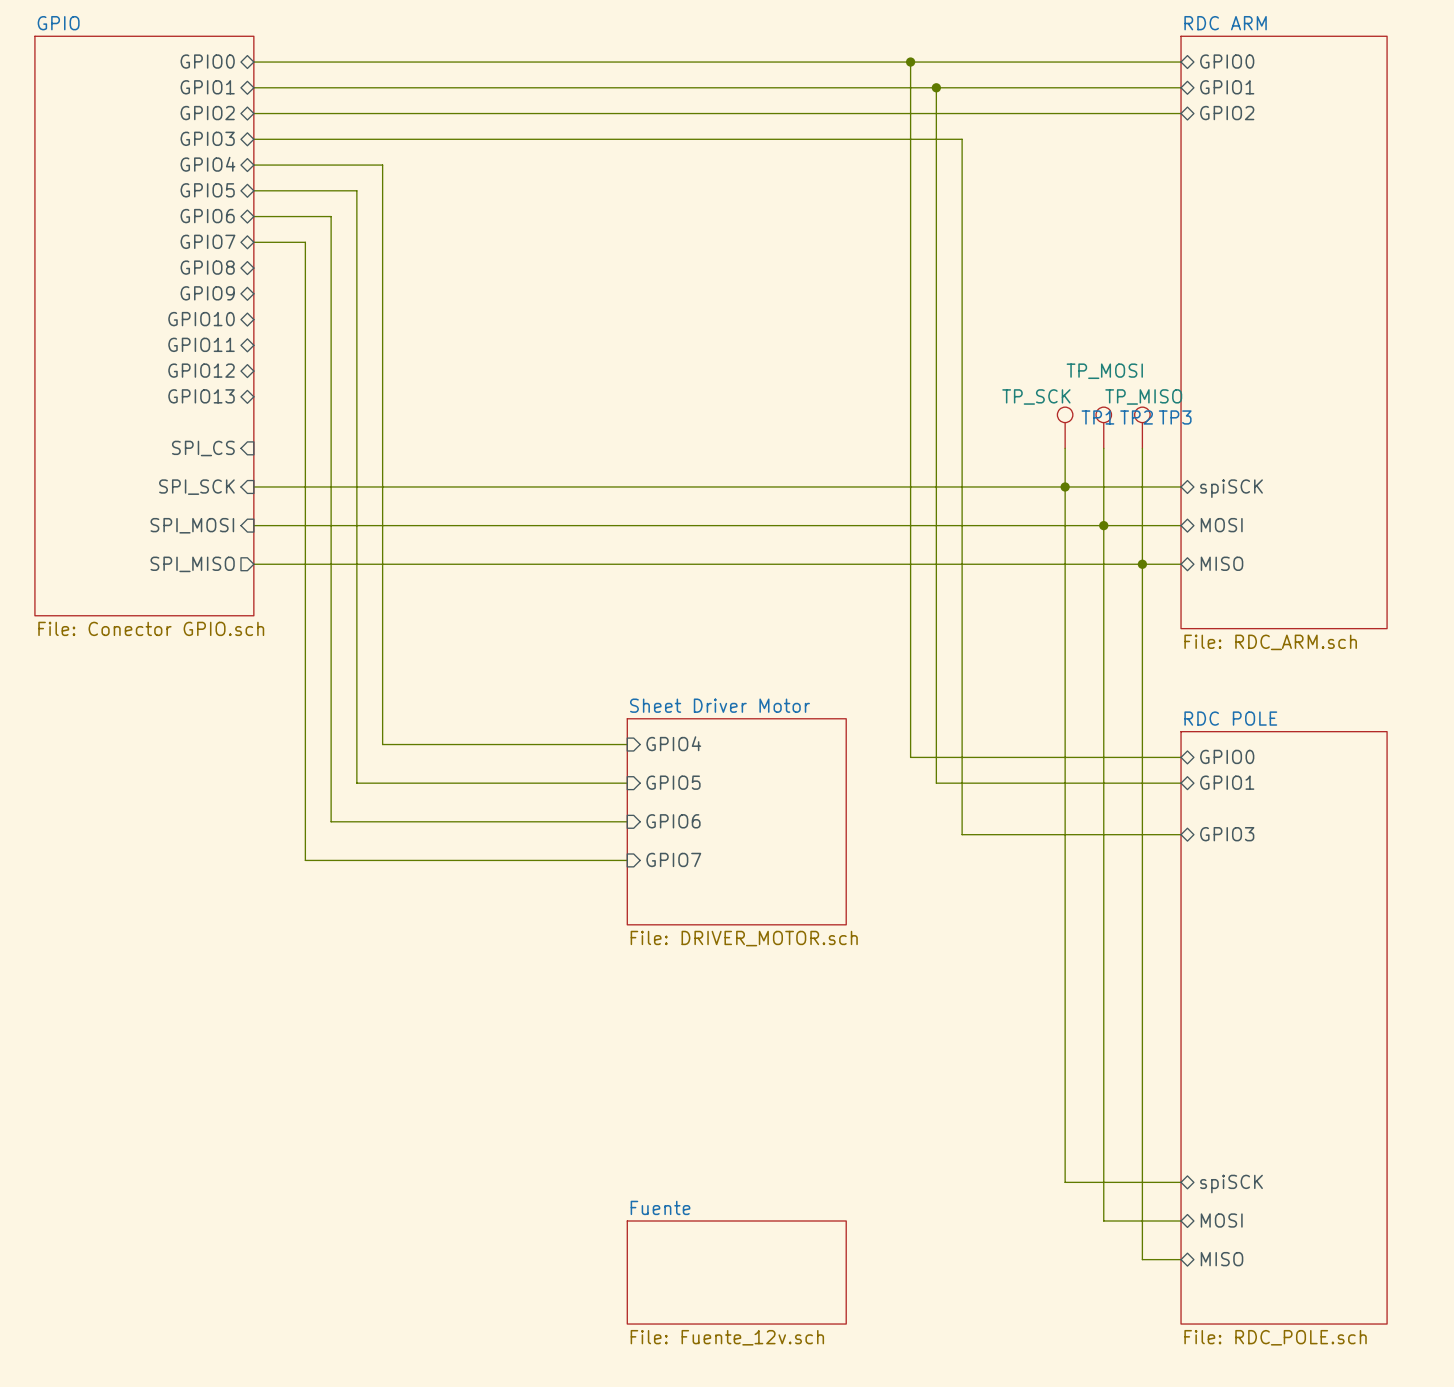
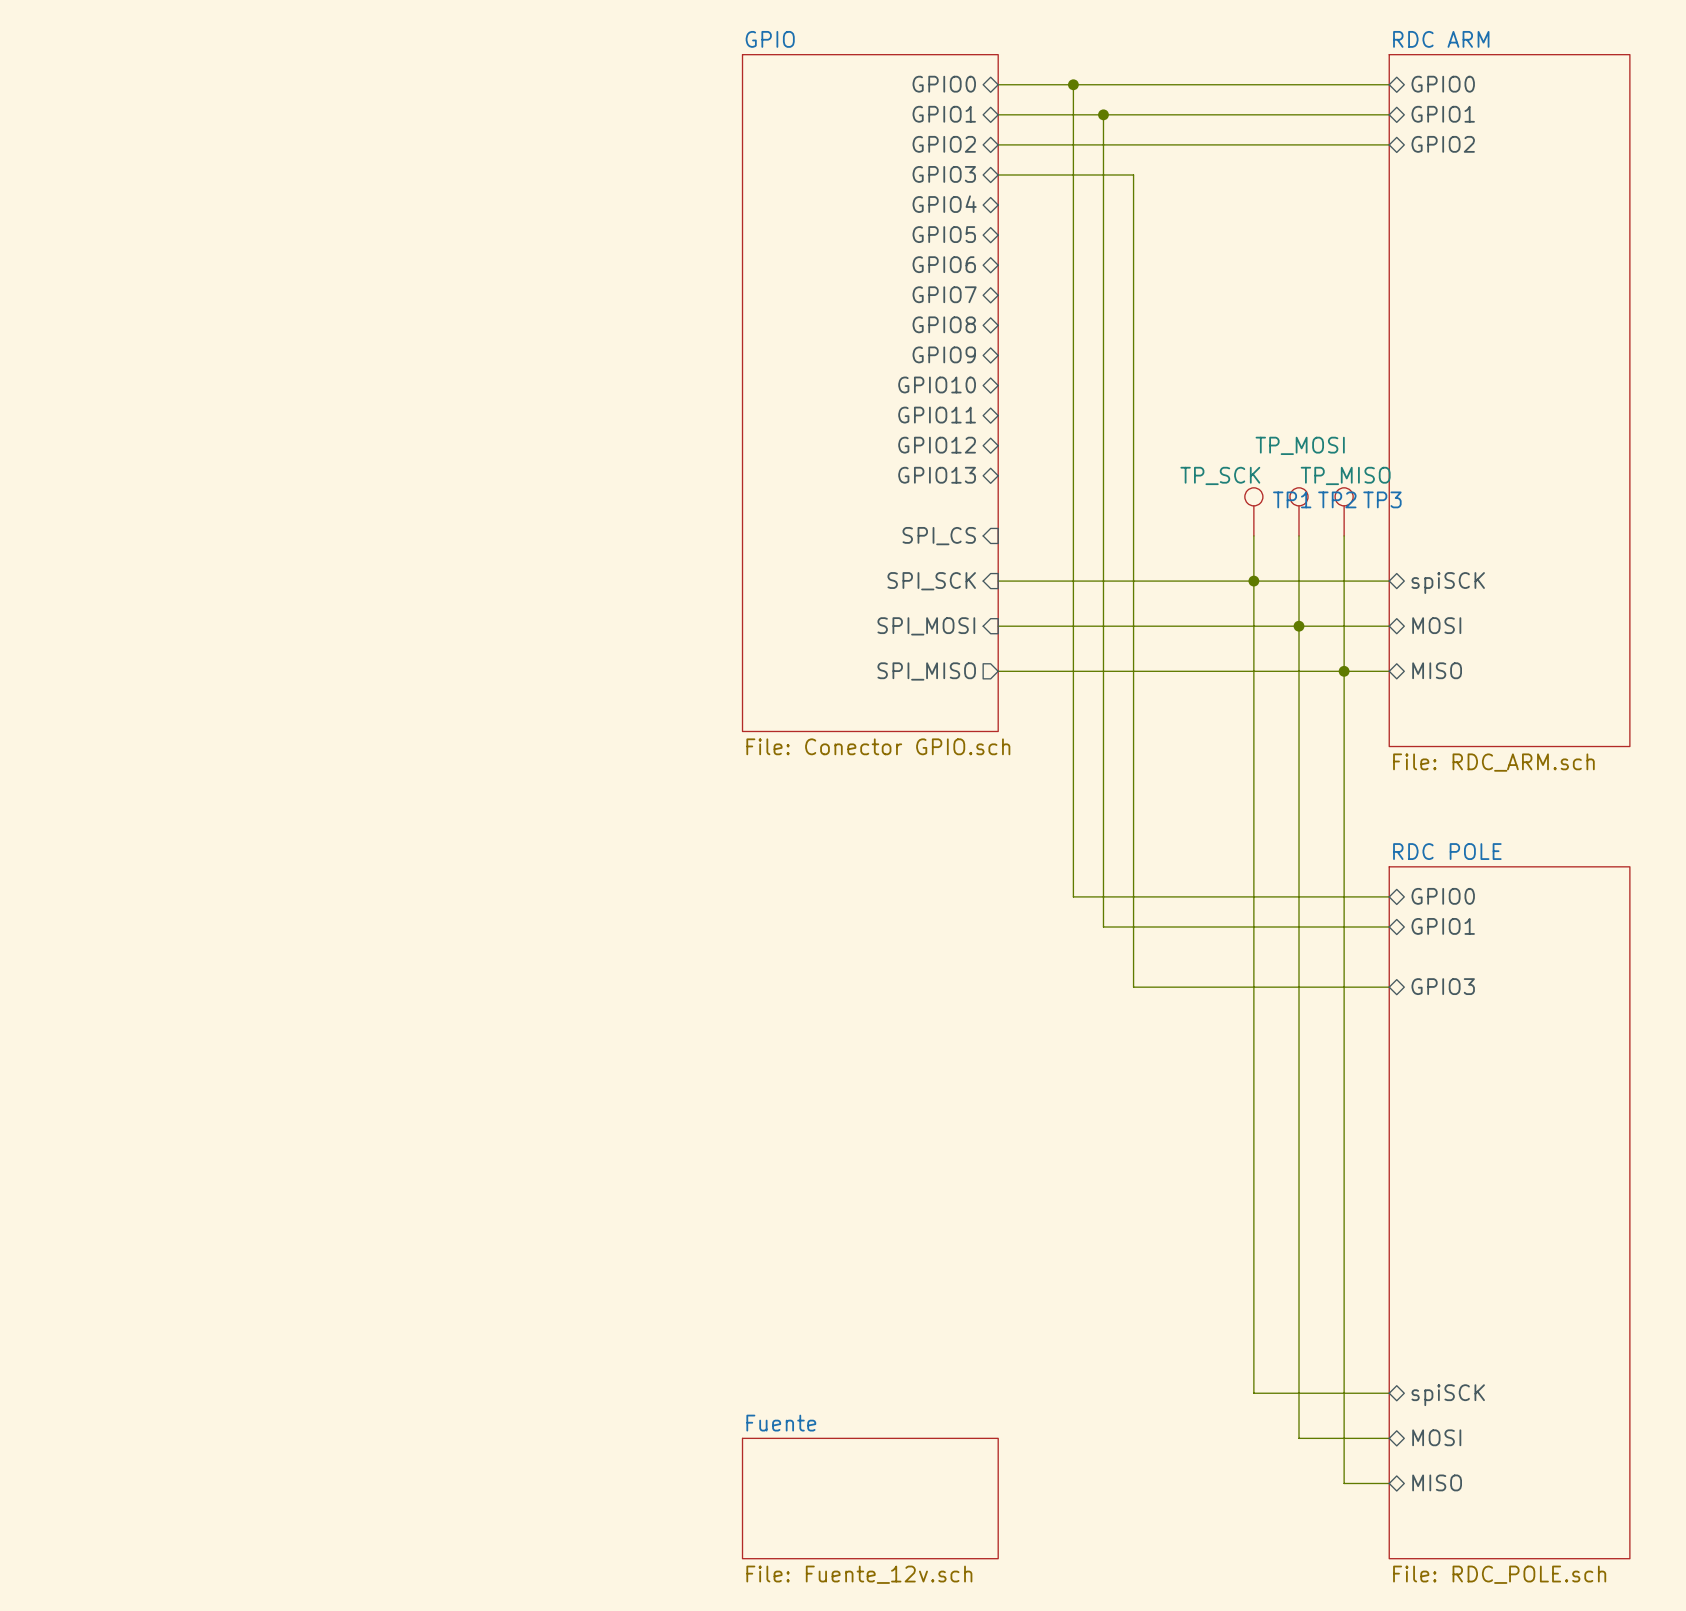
sheet pin: GPIO0 (207, 61) -> none
sheet pin: none -> GPIO0 (944, 84)
wire: (253, 62) (846, 62) -> none
sheet pin: GPIO1 (207, 87) -> none
wire: (253, 87) (846, 87) -> none
sheet pin: none -> GPIO1 (944, 114)
sheet pin: GPIO2 (207, 113) -> none
wire: (253, 113) (846, 113) -> none
sheet pin: none -> GPIO2 (944, 144)
sheet pin: GPIO3 (207, 138) -> none
sheet pin: none -> GPIO3 (944, 174)
wire: (253, 139) (846, 139) -> none
sheet pin: GPIO4 (207, 164) -> none
sheet pin: none -> GPIO4 (944, 204)
wire: (253, 165) (382, 165) (382, 744) (627, 744) -> none
sheet pin: GPIO5 (207, 190) -> none
wire: (253, 190) (356, 190) (356, 783) (627, 783) -> none
sheet pin: none -> GPIO5 (944, 234)
sheet pin: GPIO6 (207, 216) -> none
wire: (253, 216) (331, 216) (331, 821) (627, 821) -> none
sheet pin: none -> GPIO6 (944, 264)
sheet pin: GPIO7 (207, 241) -> none
sheet pin: none -> GPIO7 (944, 294)
wire: (253, 242) (305, 242) (305, 860) (627, 860) -> none
sheet pin: GPIO8 (207, 267) -> none
sheet pin: none -> GPIO8 (944, 324)
sheet pin: GPIO9 (207, 293) -> none
sheet pin: none -> GPIO9 (944, 354)
sheet pin: GPIO10 (201, 319) -> none
sheet pin: none -> GPIO10 (937, 384)
sheet GPIO: File: Conector GPIO.sch (144, 326) -> none
sheet GPIO: none -> File: Conector GPIO.sch (870, 393)
sheet pin: GPIO11 (201, 344) -> none
sheet pin: none -> GPIO11 (937, 415)
sheet pin: GPIO12 (201, 370) -> none
sheet pin: none -> GPIO12 (937, 445)
sheet pin: GPIO13 (201, 396) -> none
sheet pin: none -> GPIO13 (937, 475)
sheet pin: SPI_CS (203, 448) -> none
sheet pin: none -> SPI_CS (939, 536)
wire: (253, 486) (846, 486) -> none
sheet pin: SPI_SCK (196, 487) -> none
sheet pin: none -> SPI_SCK (931, 581)
sheet pin: SPI_MOSI (192, 525) -> none
wire: (253, 525) (846, 525) -> none
sheet pin: none -> SPI_MOSI (926, 626)
sheet pin: SPI_MISO (192, 564) -> none
wire: (253, 564) (846, 564) -> none
sheet pin: none -> SPI_MISO (926, 671)
sheet pin: GPIO4 (673, 743) -> none
sheet pin: GPIO5 (673, 782) -> none
sheet pin: GPIO6 (673, 821) -> none
sheet Sheet Driver Motor: File: DRIVER_MOTOR.sch (736, 821) -> none
sheet pin: GPIO7 (673, 859) -> none

